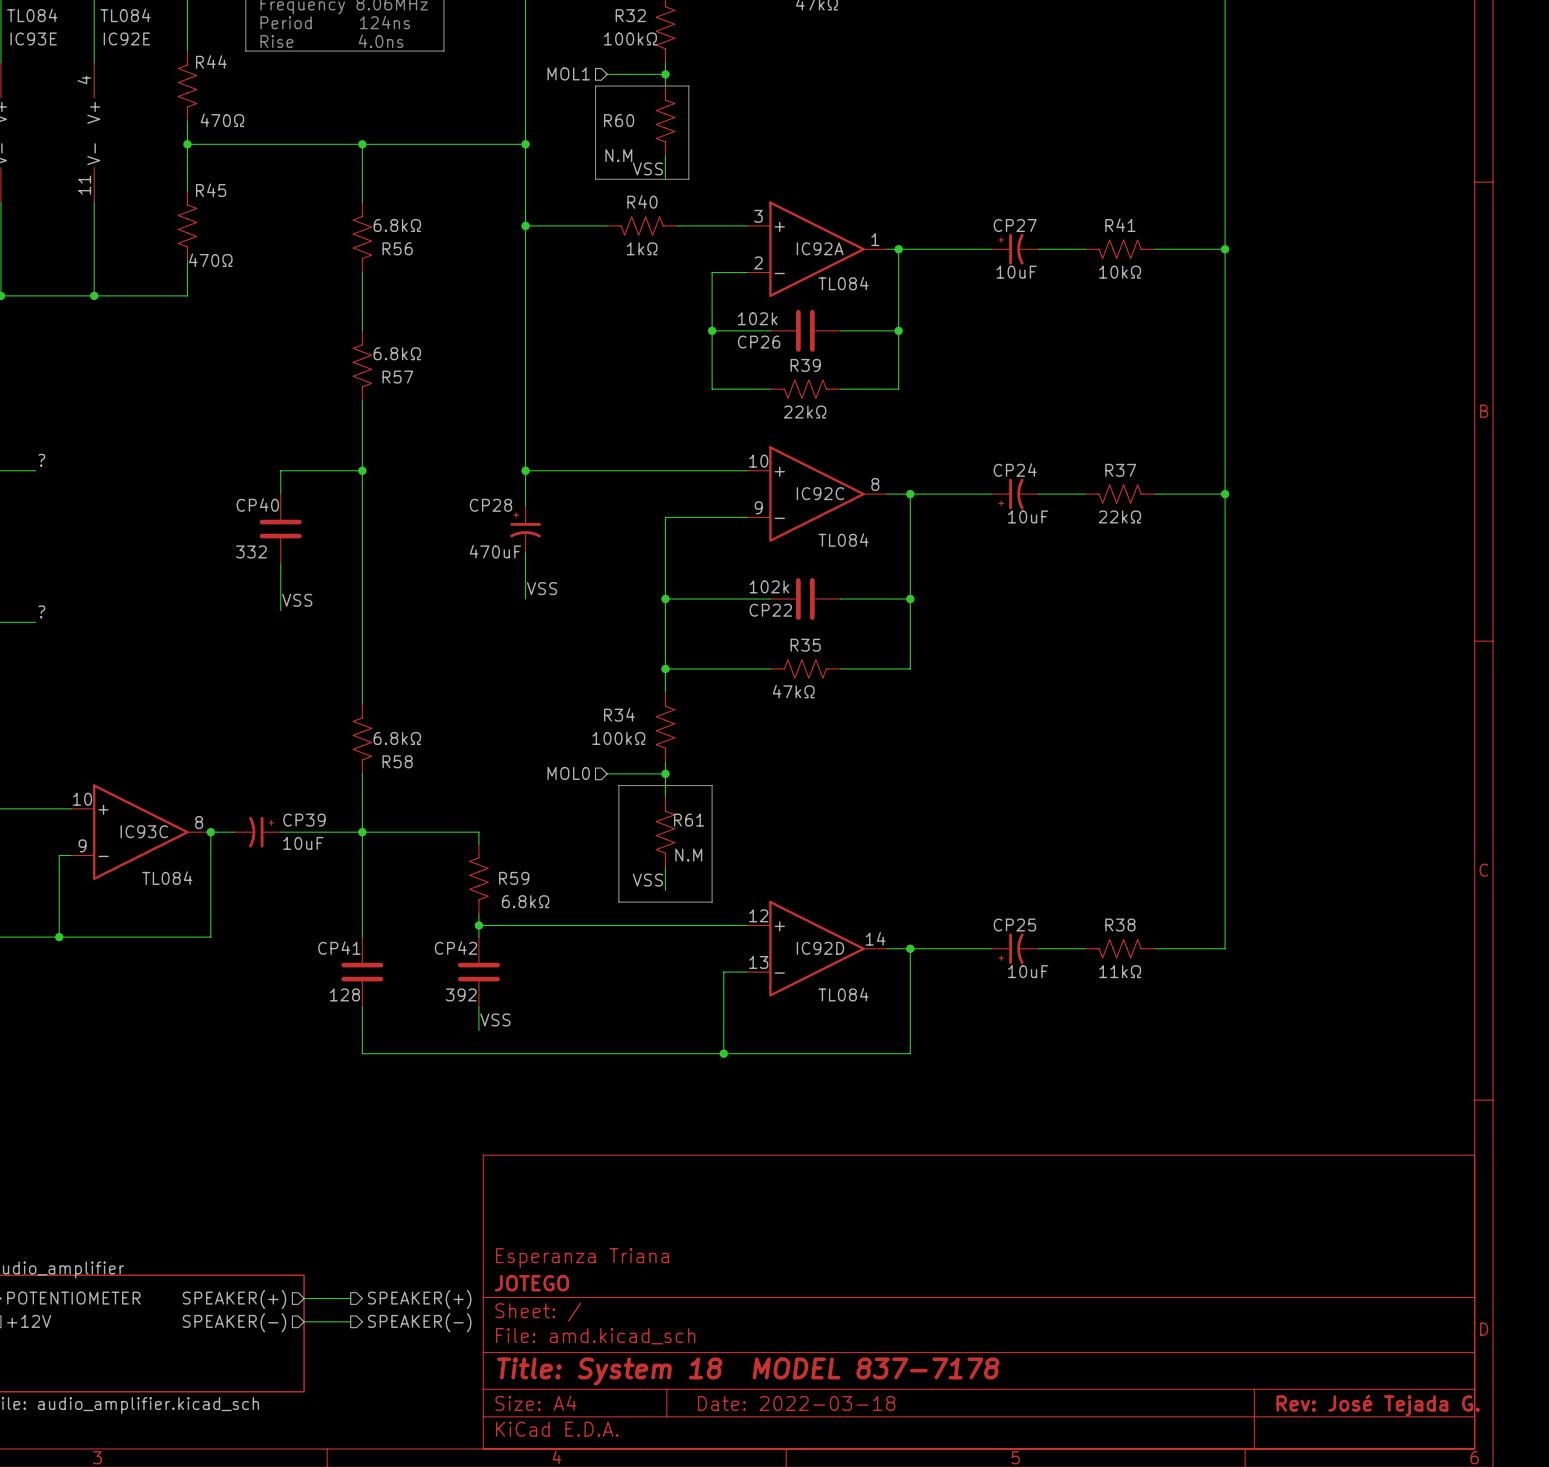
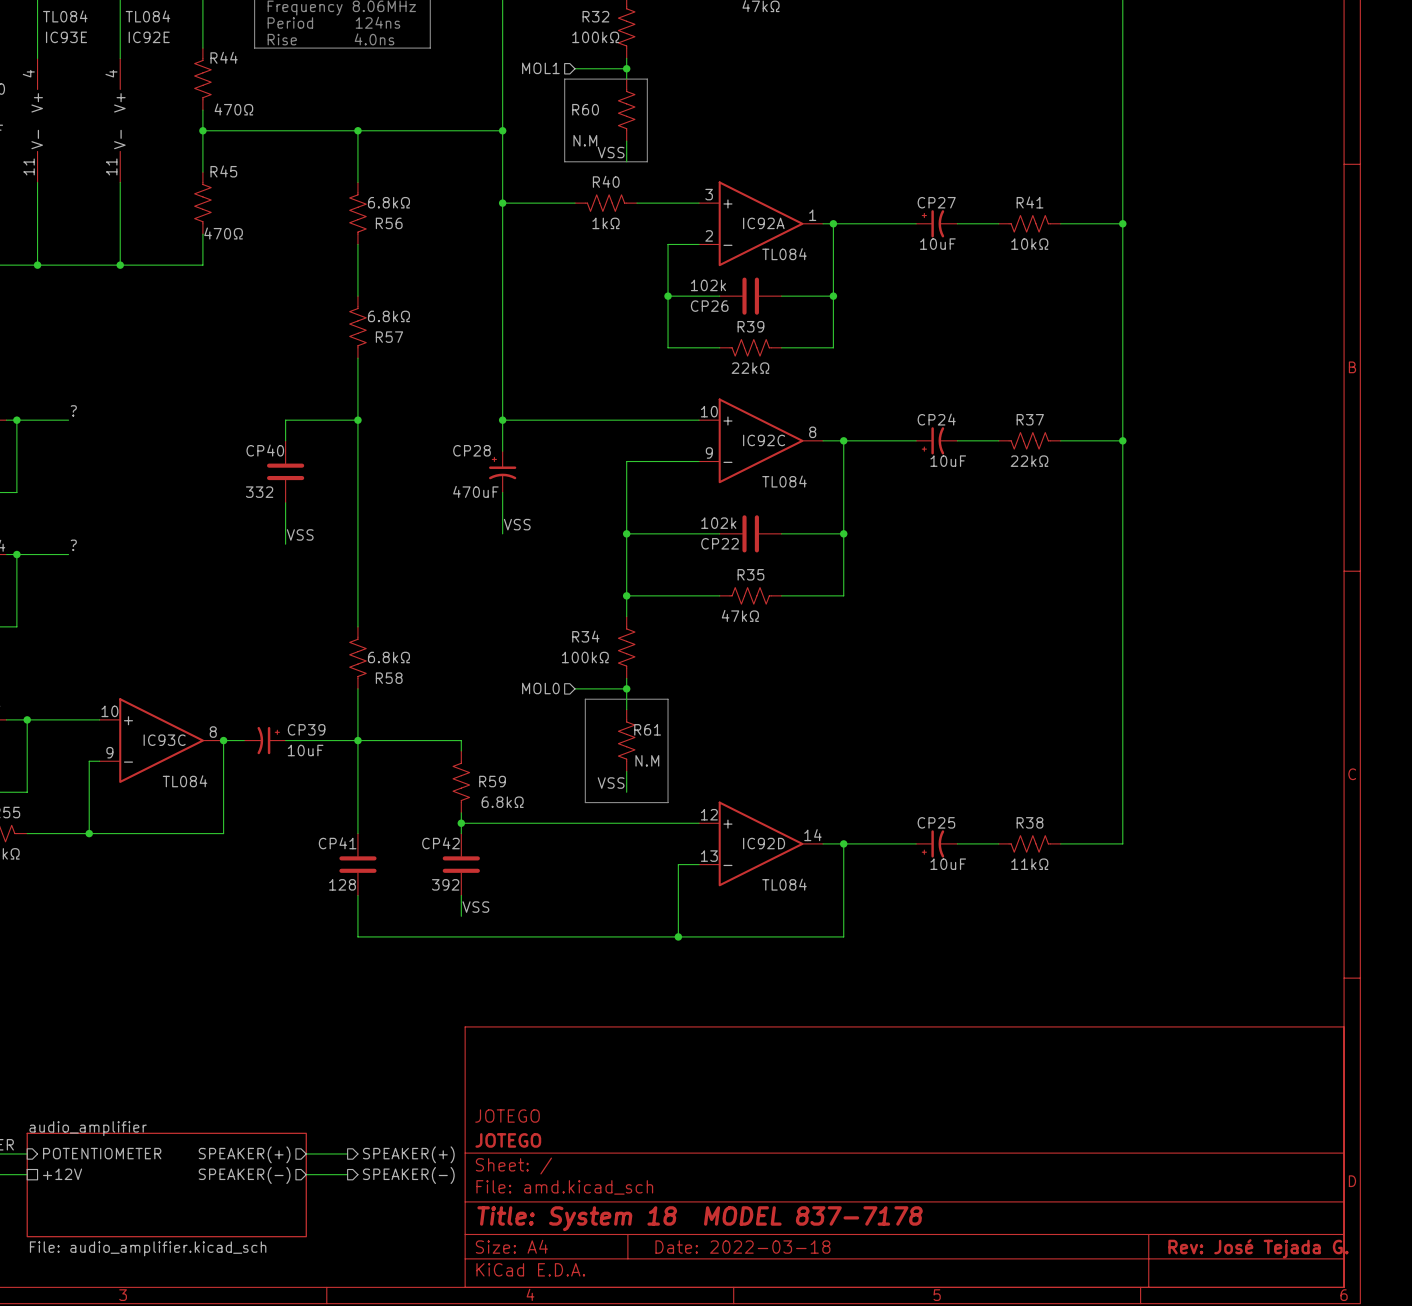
title block: Esperanza Triana (582, 1257) -> JOTEGO (507, 1116)

